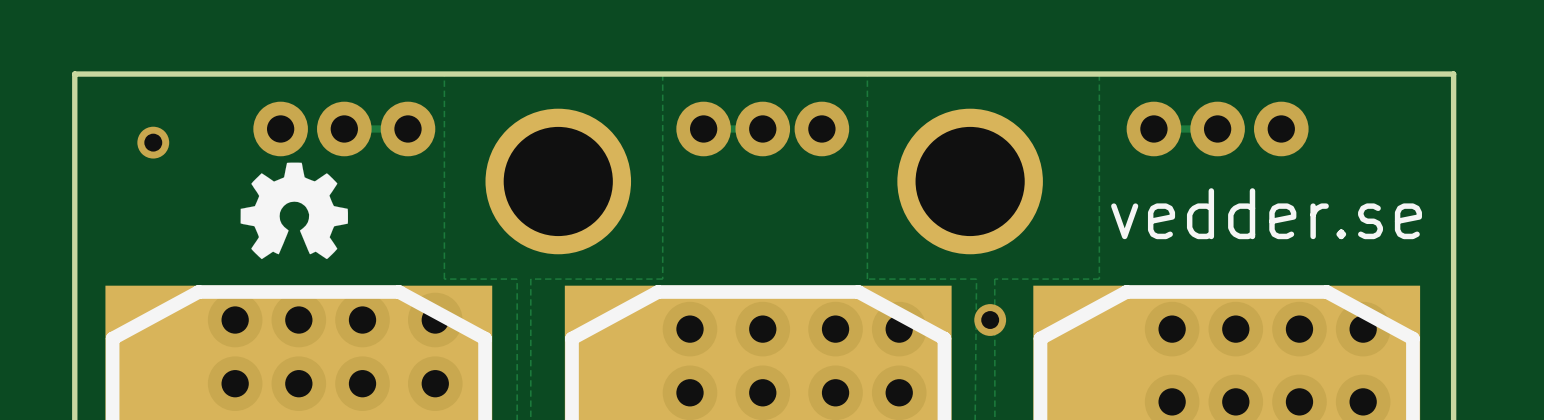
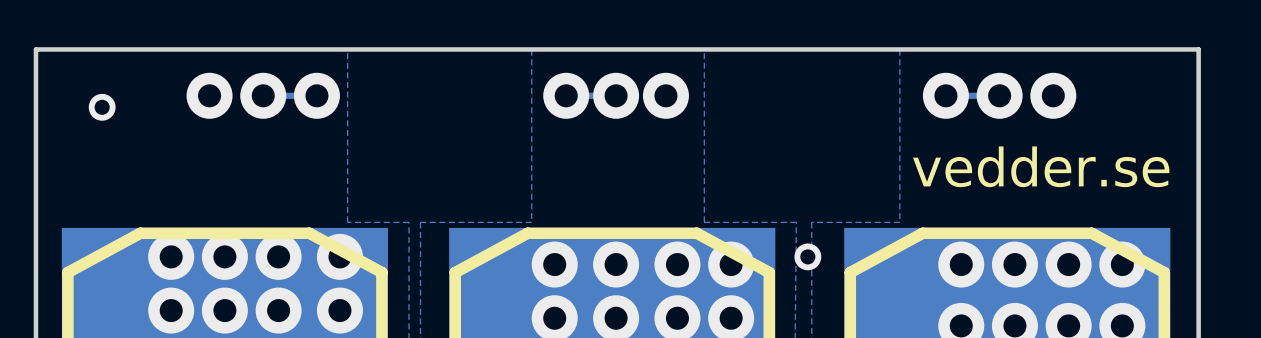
drawing: [240, 162, 349, 260] -> none
part: (558, 181) -> none
part: (970, 181) -> none

